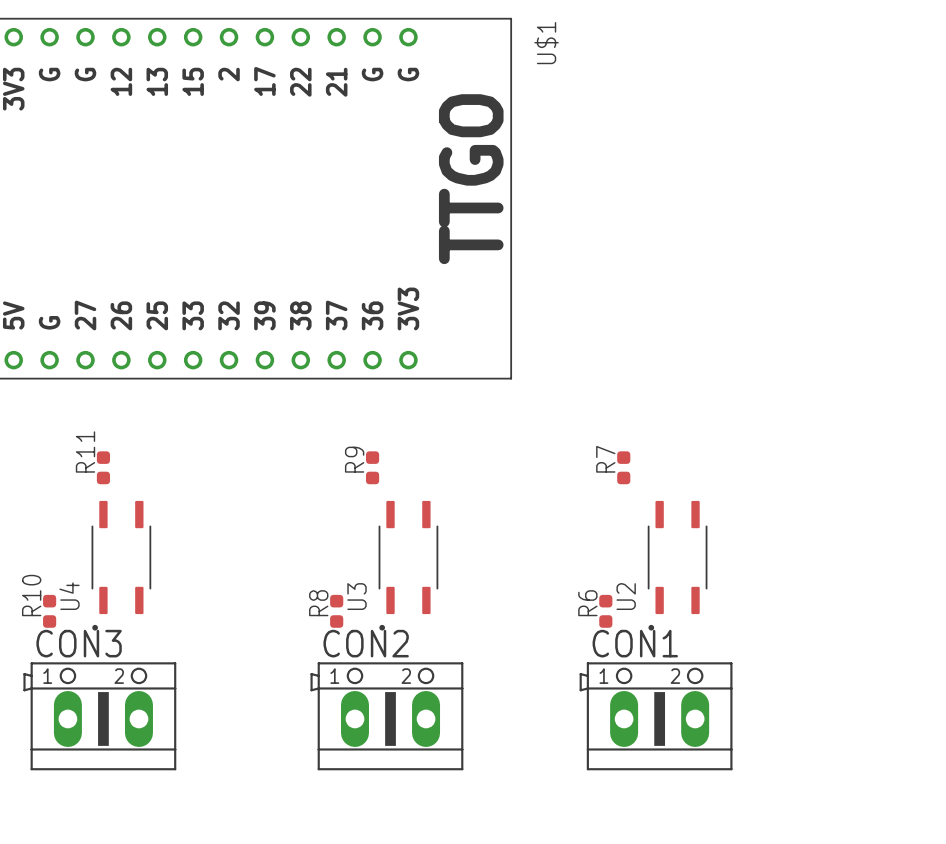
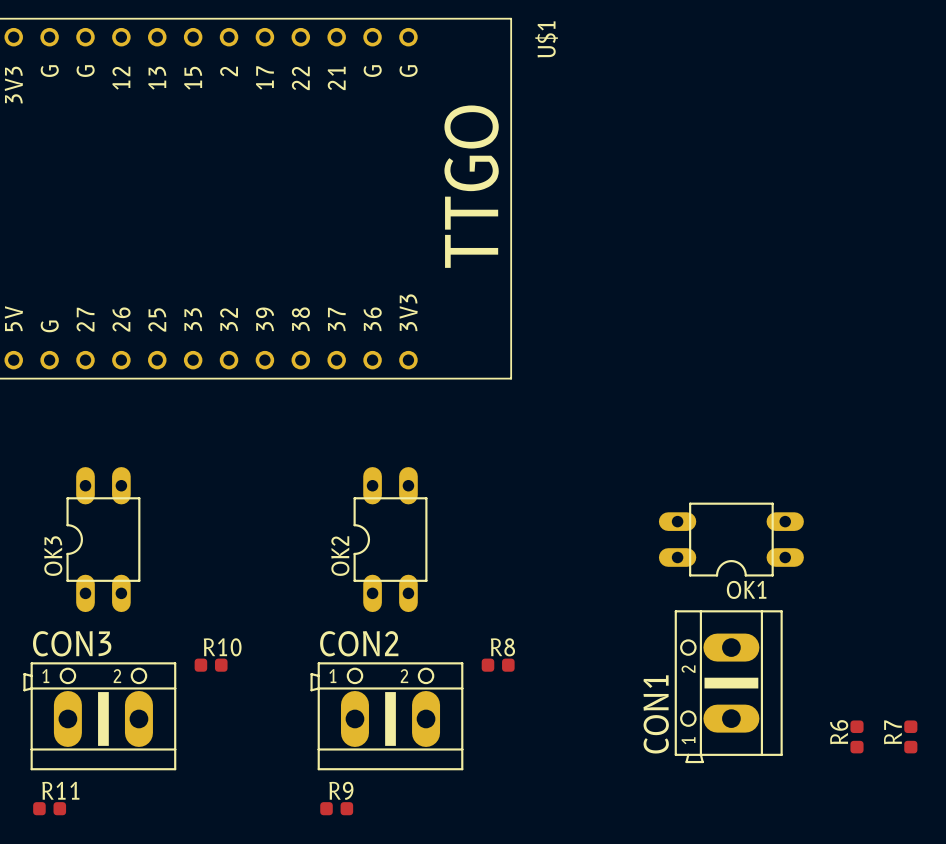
R11 rotation: 0° (103, 467) -> 90° clockwise (49, 808)
R11 position: (103, 467) -> (49, 808)
R9 rotation: 0° (372, 467) -> 90° clockwise (336, 808)
R9 position: (372, 467) -> (336, 808)
R7 position: (623, 467) -> (910, 736)
OK3: none -> (103, 539)
OK2: none -> (390, 539)
OK1: none -> (731, 539)
U4: (121, 565) -> none
U3: (408, 565) -> none
U2: (677, 565) -> none
R10 rotation: 0° (49, 611) -> 90° clockwise (211, 665)
R10 position: (49, 611) -> (211, 665)
R8 rotation: 0° (336, 611) -> 90° clockwise (498, 665)
R8 position: (336, 611) -> (498, 665)
R6 position: (605, 611) -> (857, 736)
CON1 rotation: 0° (656, 716) -> 90° counterclockwise (728, 686)

